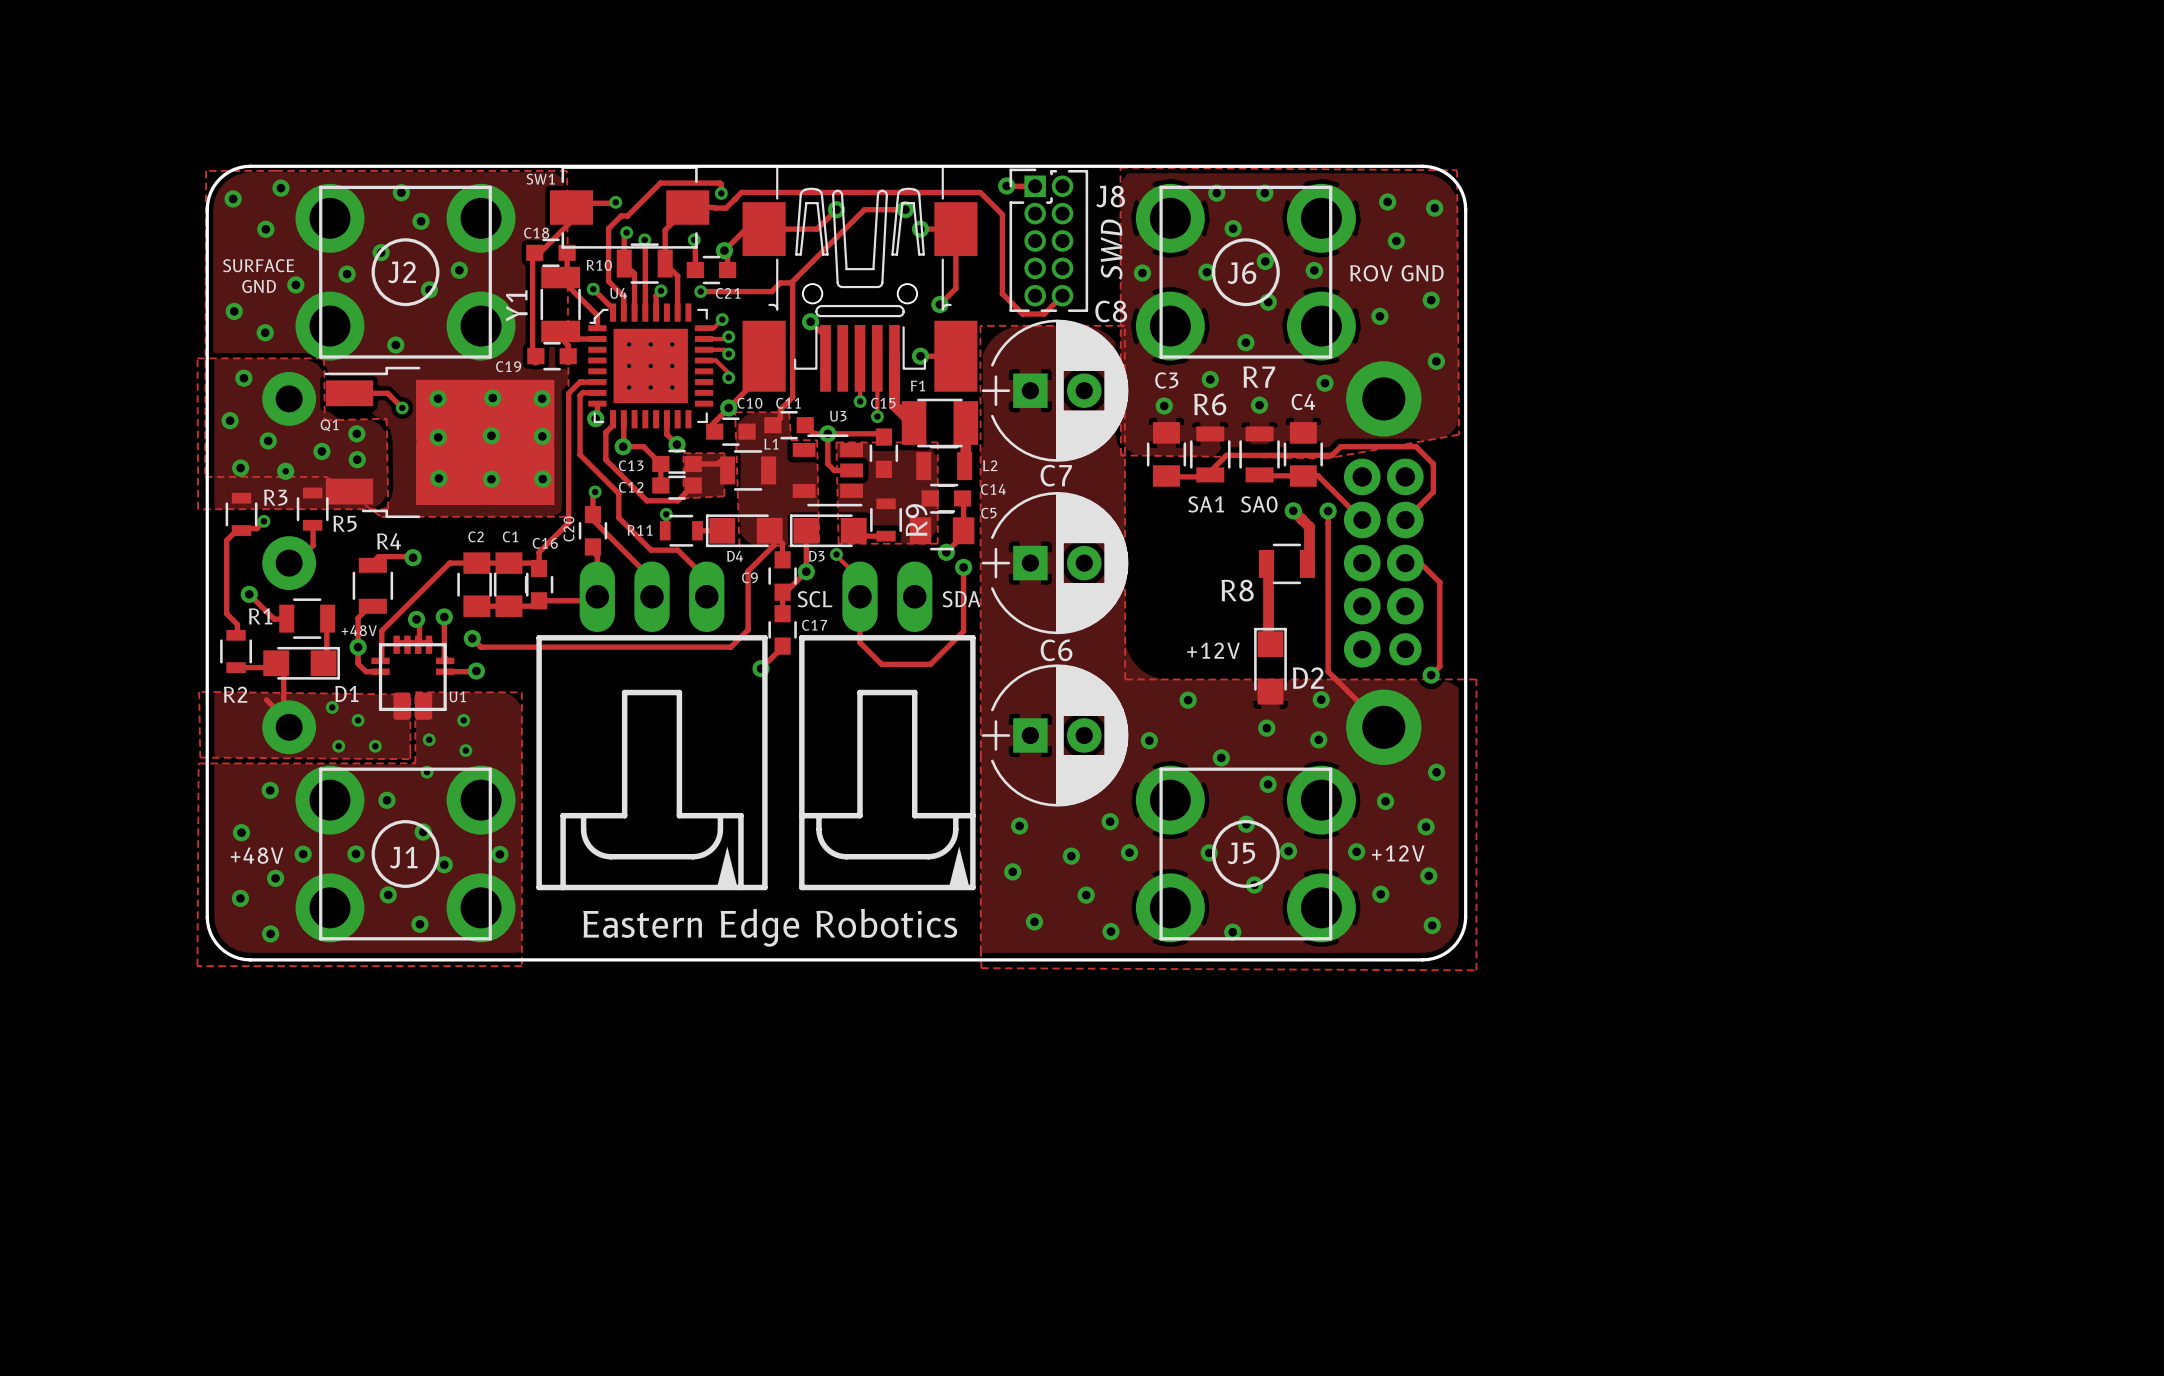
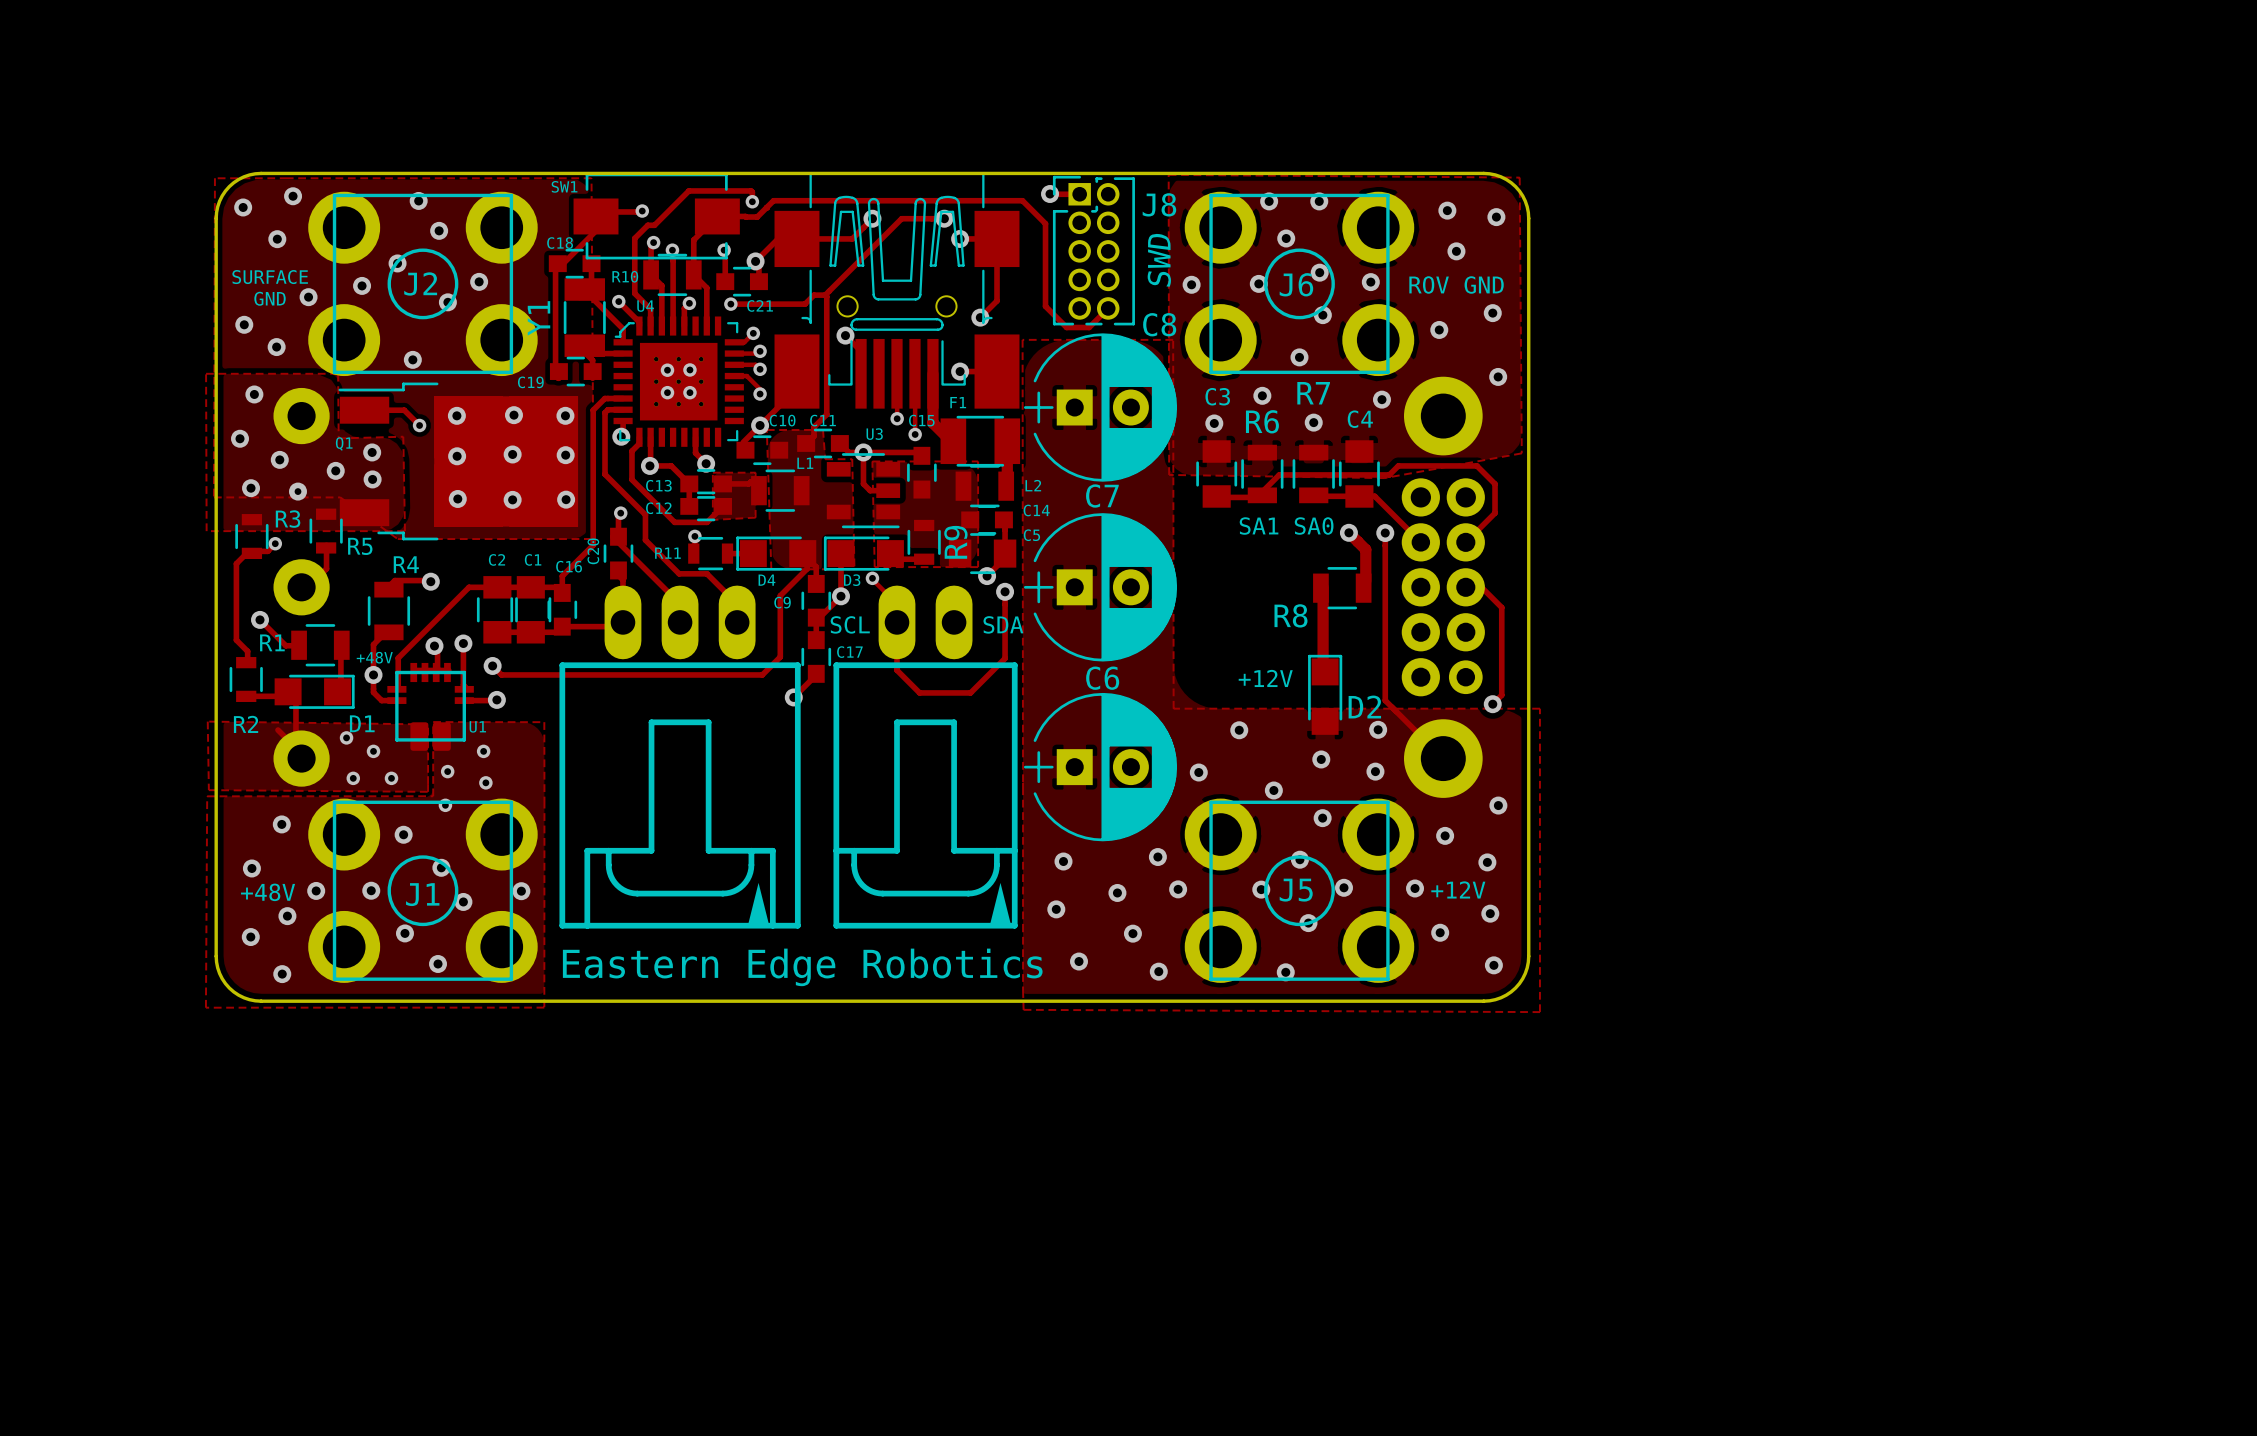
via: none -> (667, 370)
via: none -> (689, 369)
via: none -> (667, 392)
via: none -> (689, 392)

